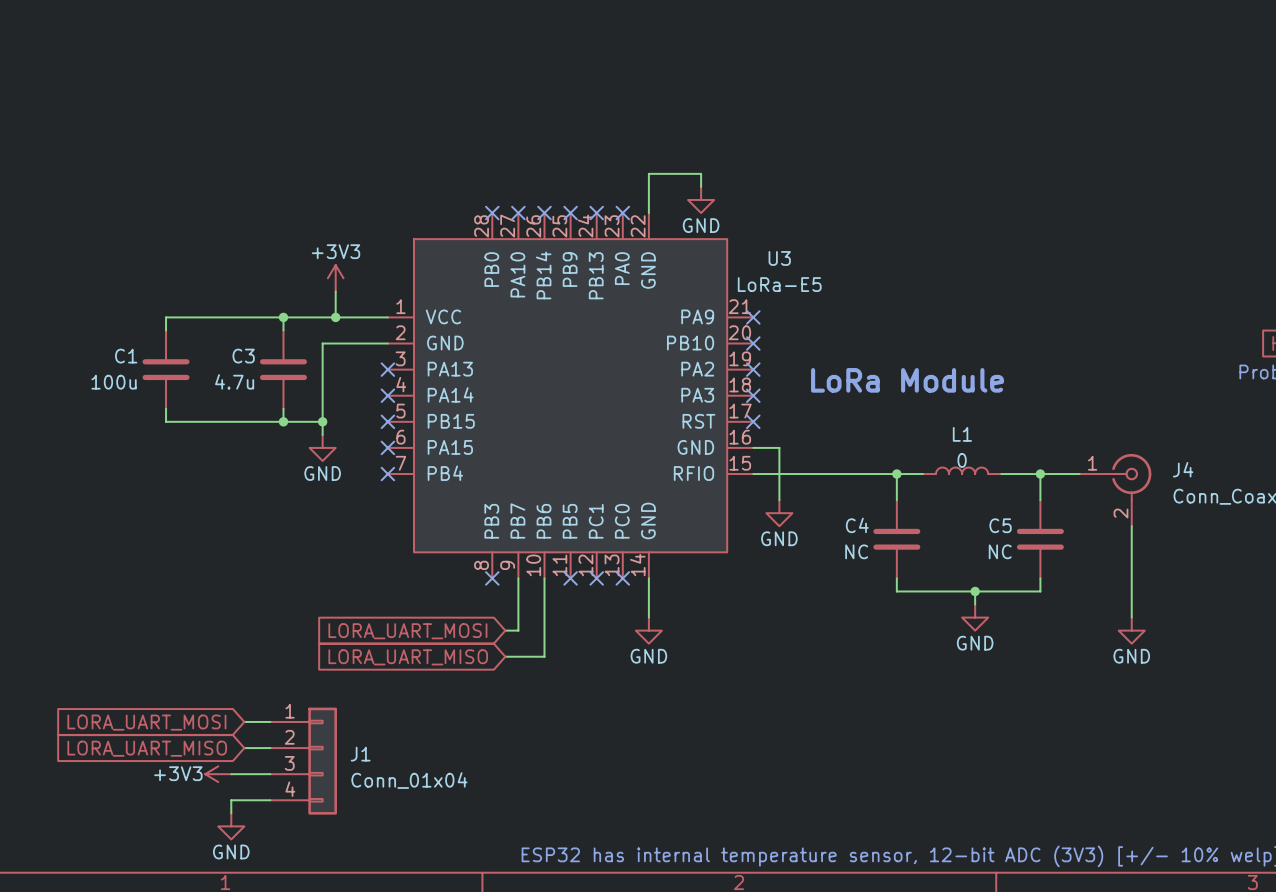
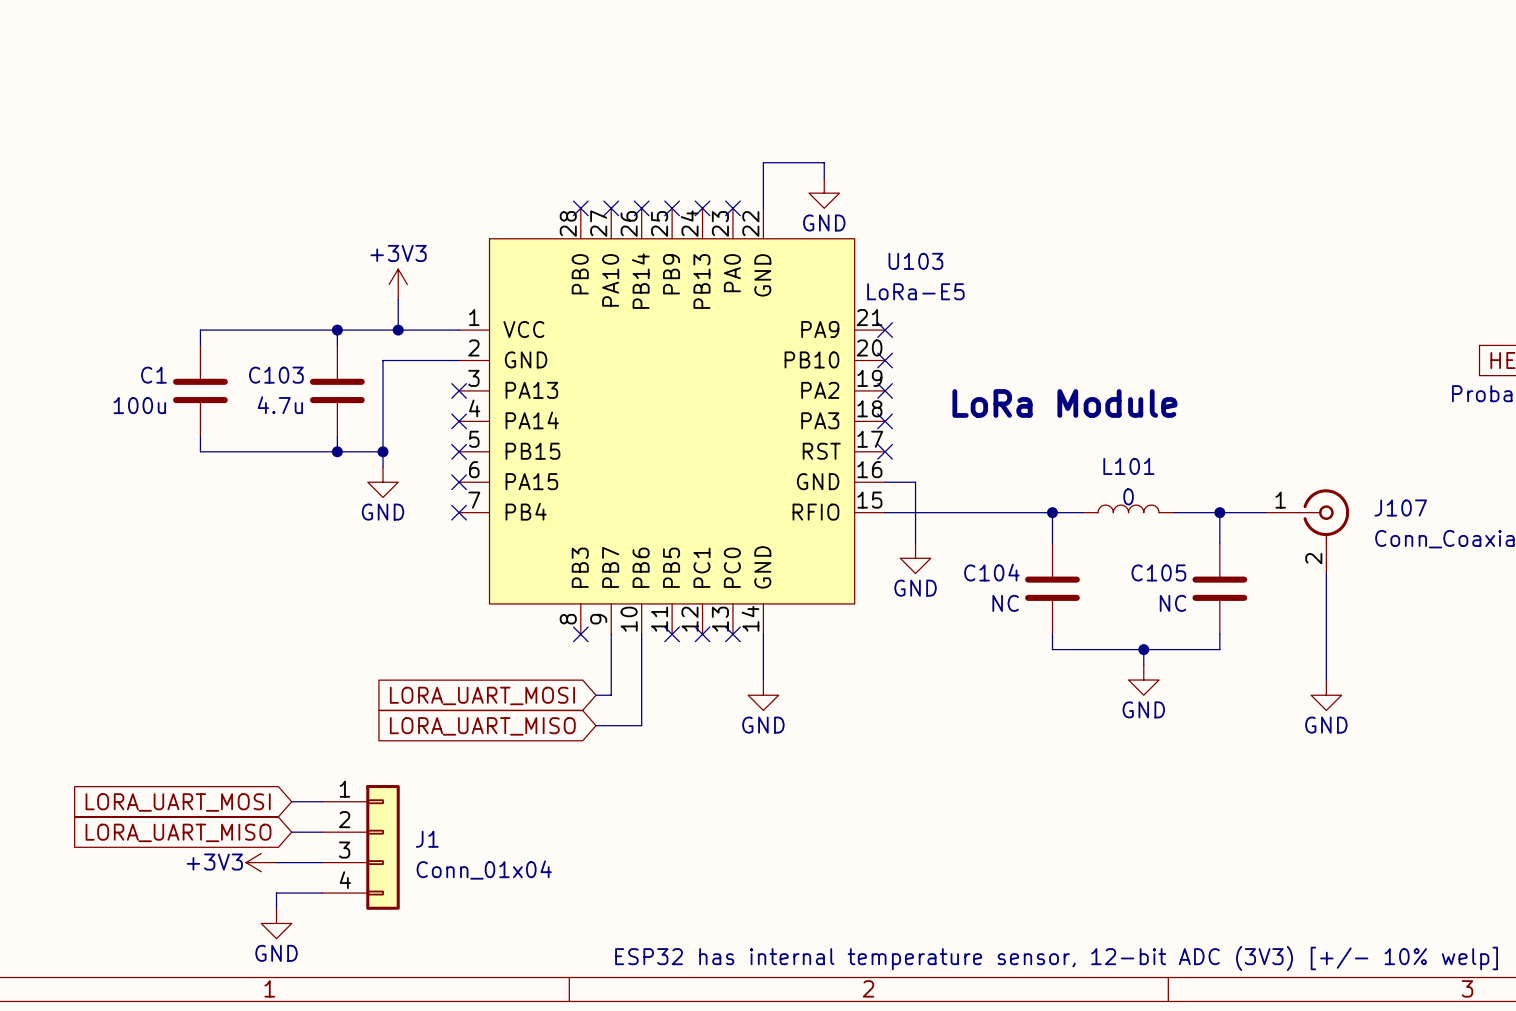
U3 name: U3 (779, 258) -> U103 (915, 261)
C3 name: C3 (243, 356) -> C103 (276, 375)
L1 name: L1 (962, 434) -> L101 (1128, 466)
J4 name: J4 (1183, 469) -> J107 (1400, 508)
C4 name: C4 (857, 525) -> C104 (991, 572)
C5 name: C5 (1000, 525) -> C105 (1158, 572)

